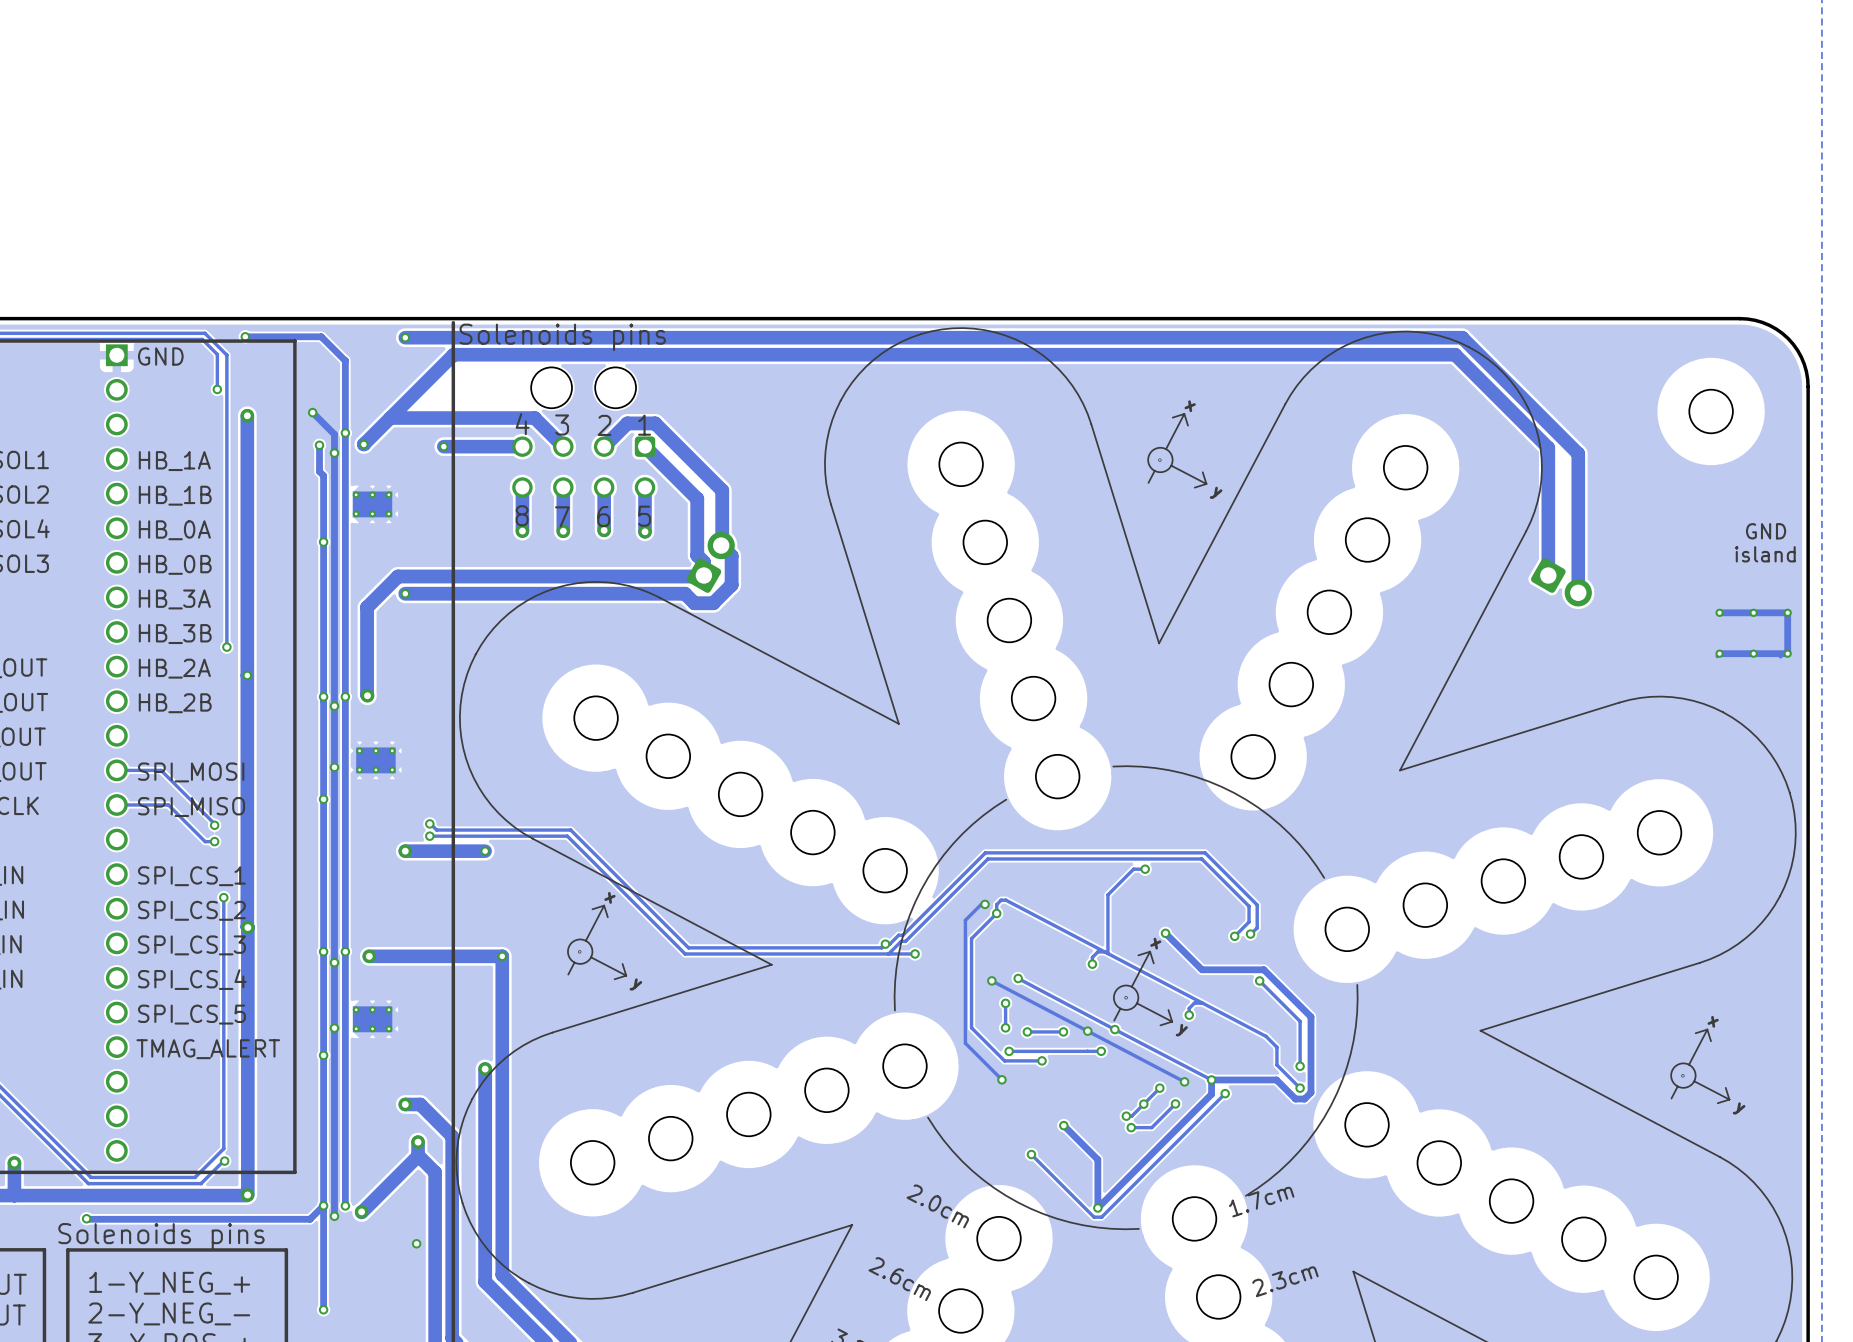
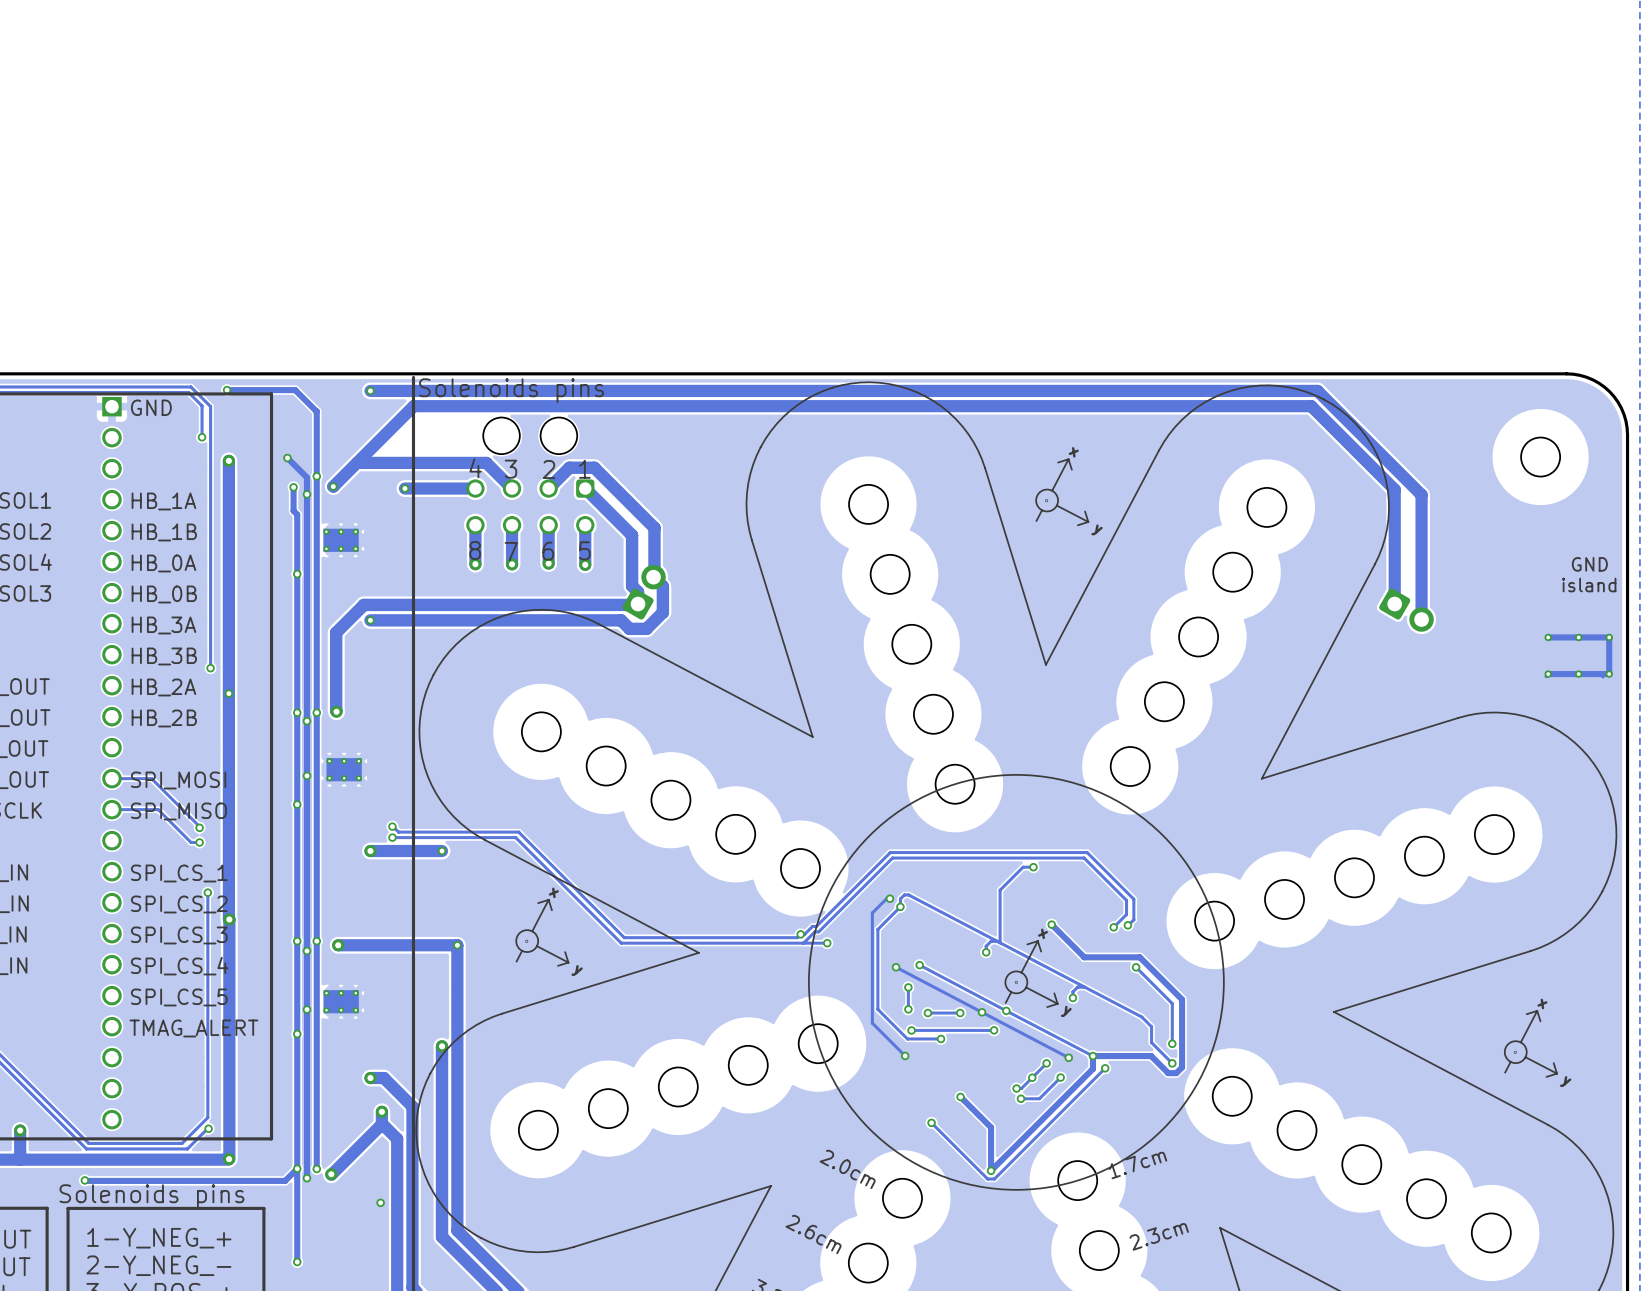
drawing: none -> [808, 774, 1225, 1191]
line: (1113, 766) (1141, 766) (1168, 770) (1195, 776) (1234, 792) (1269, 815) (1289, 834) (1308, 854) (1324, 877) -> none
line: (1006, 799) (983, 815) (962, 833) (944, 854) (921, 889) (909, 914) (901, 941) (896, 968) (894, 1010) -> none
line: (1357, 984) (1357, 1012) (1353, 1040) (1346, 1067) (1330, 1105) (1316, 1129) (1289, 1161) (1268, 1180) (1245, 1195) -> none
line: (928, 1117) (952, 1151) (972, 1170) (994, 1188) (1018, 1202) (1043, 1213) (1083, 1225) (1111, 1228) (1138, 1228) -> none

